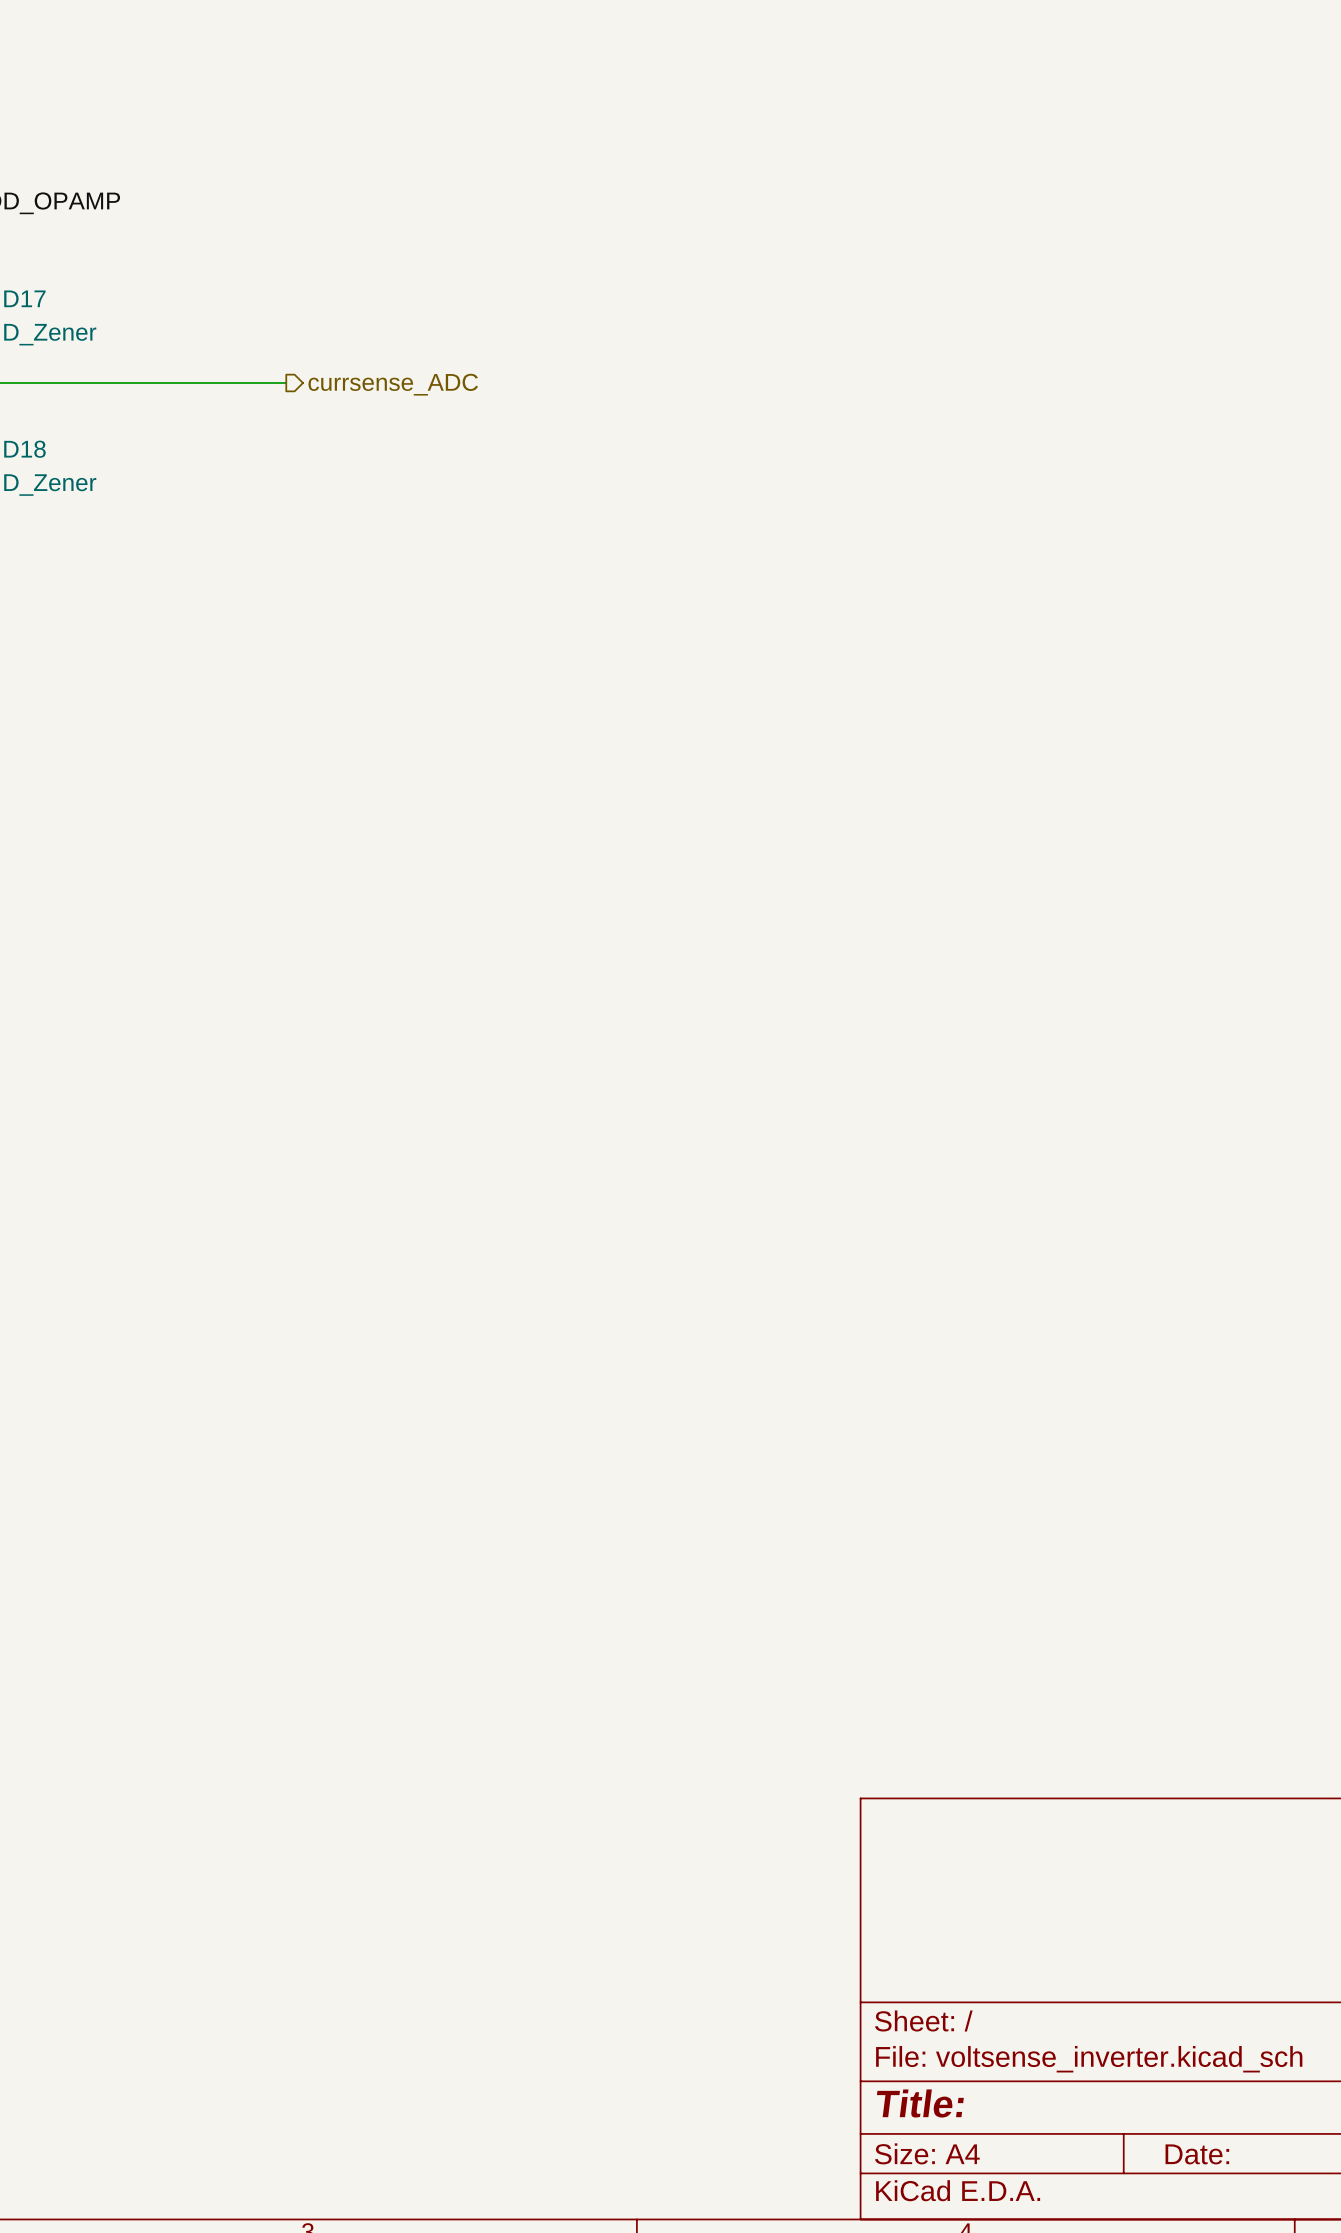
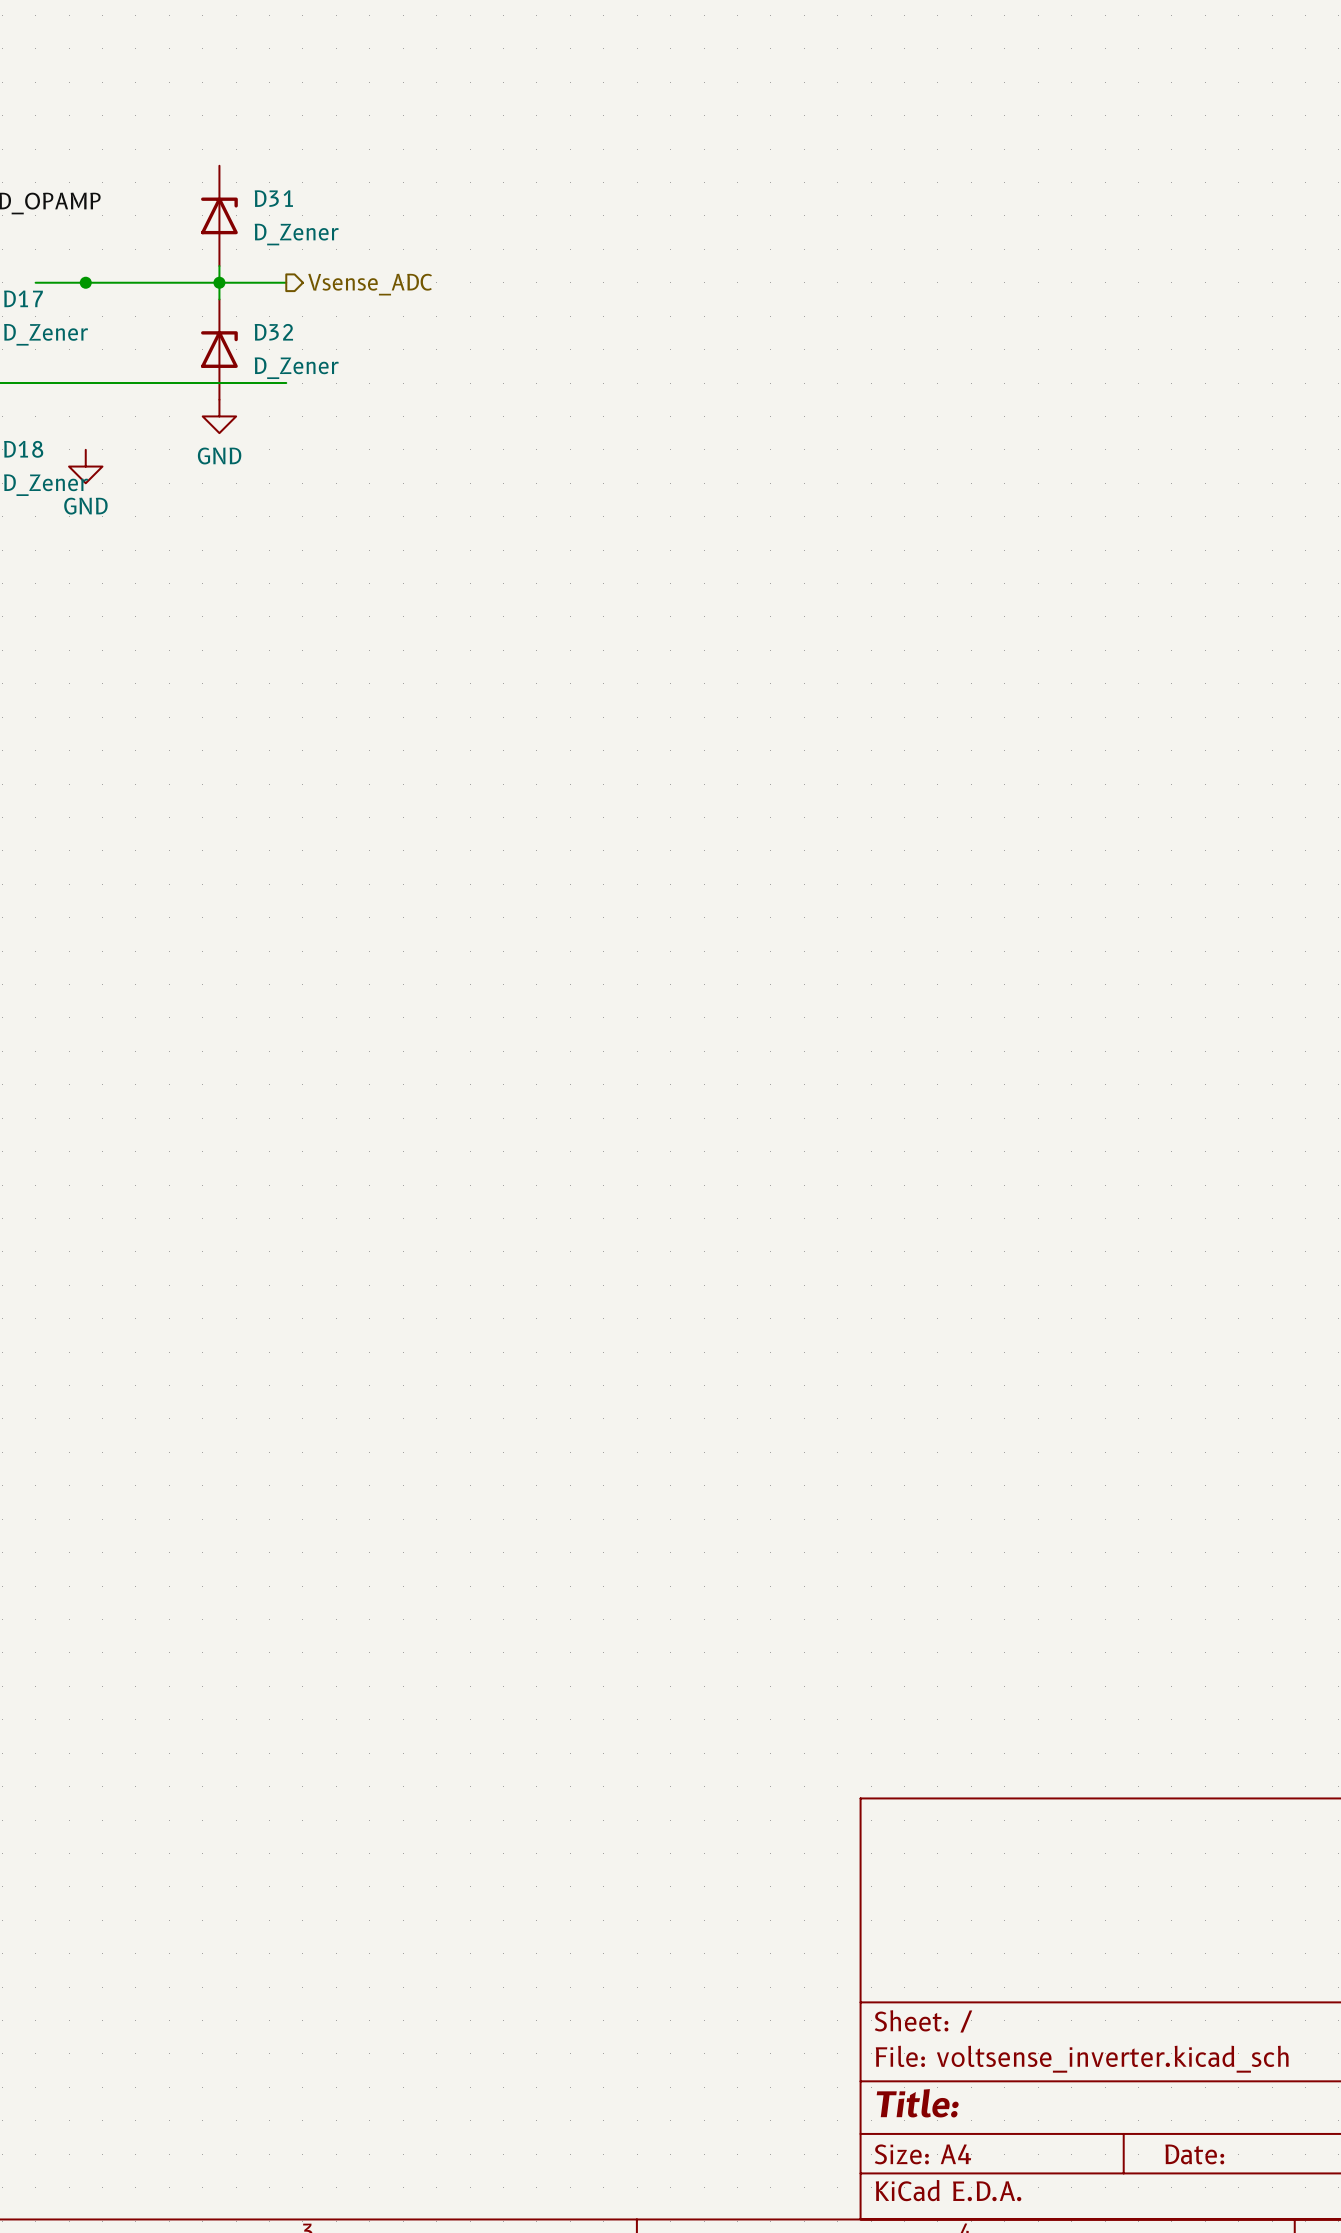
D31: none -> D_Zener (219, 215)
wire: none -> (219, 266) (219, 299)
wire: none -> (35, 282) (286, 282)
junction: none -> (85, 282)
junction: none -> (219, 282)
hierarchical label: none -> Vsense_ADC (370, 284)
D32: none -> D_Zener (219, 349)
hierarchical label: currsense_ADC (393, 384) -> none
power symbol: none -> GND (219, 416)
power symbol: none -> GND (85, 466)

